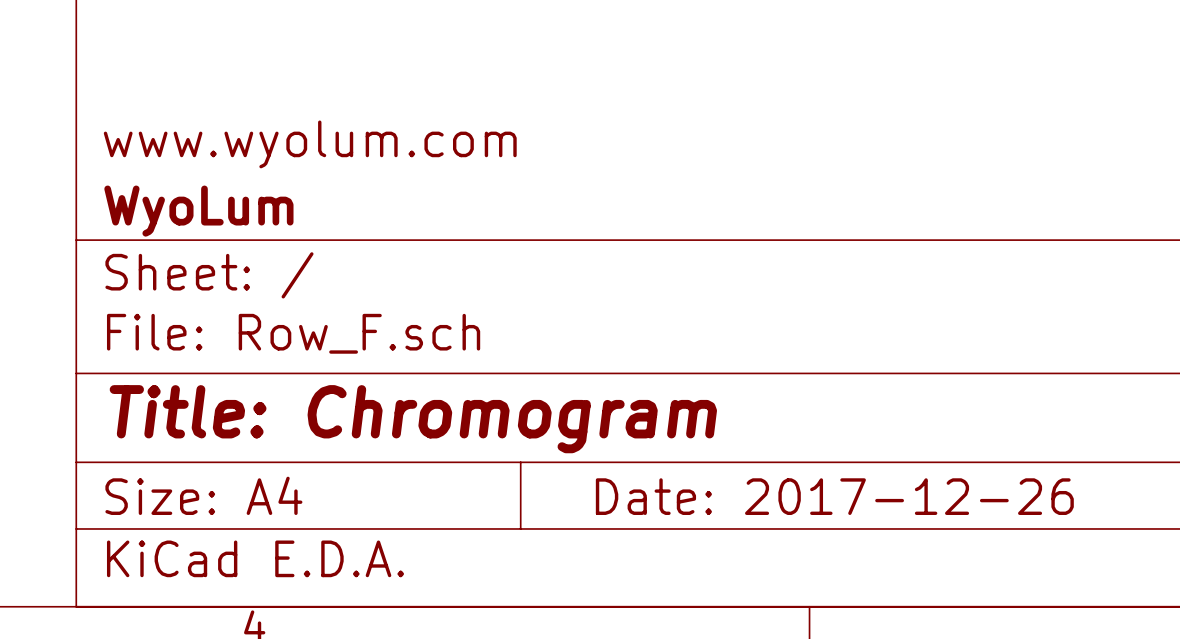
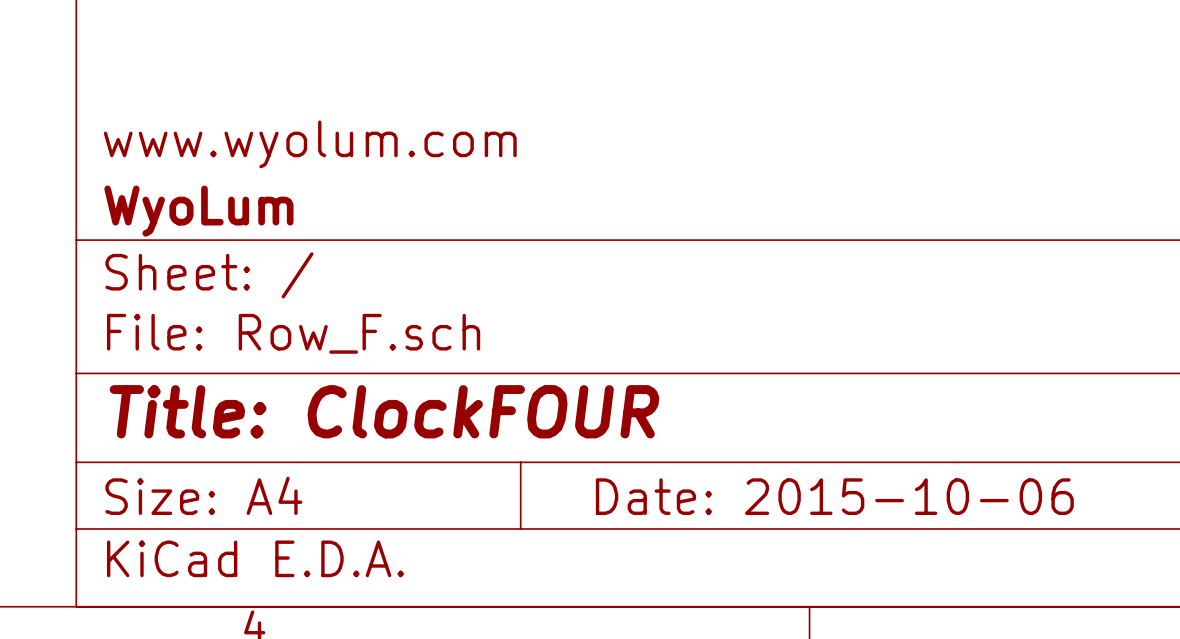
title block: Title: Chromogram (413, 419) -> Title: ClockFOUR (384, 411)
title block: Date: 2017-12-26 (834, 496) -> Date: 2015-10-06 (834, 496)

